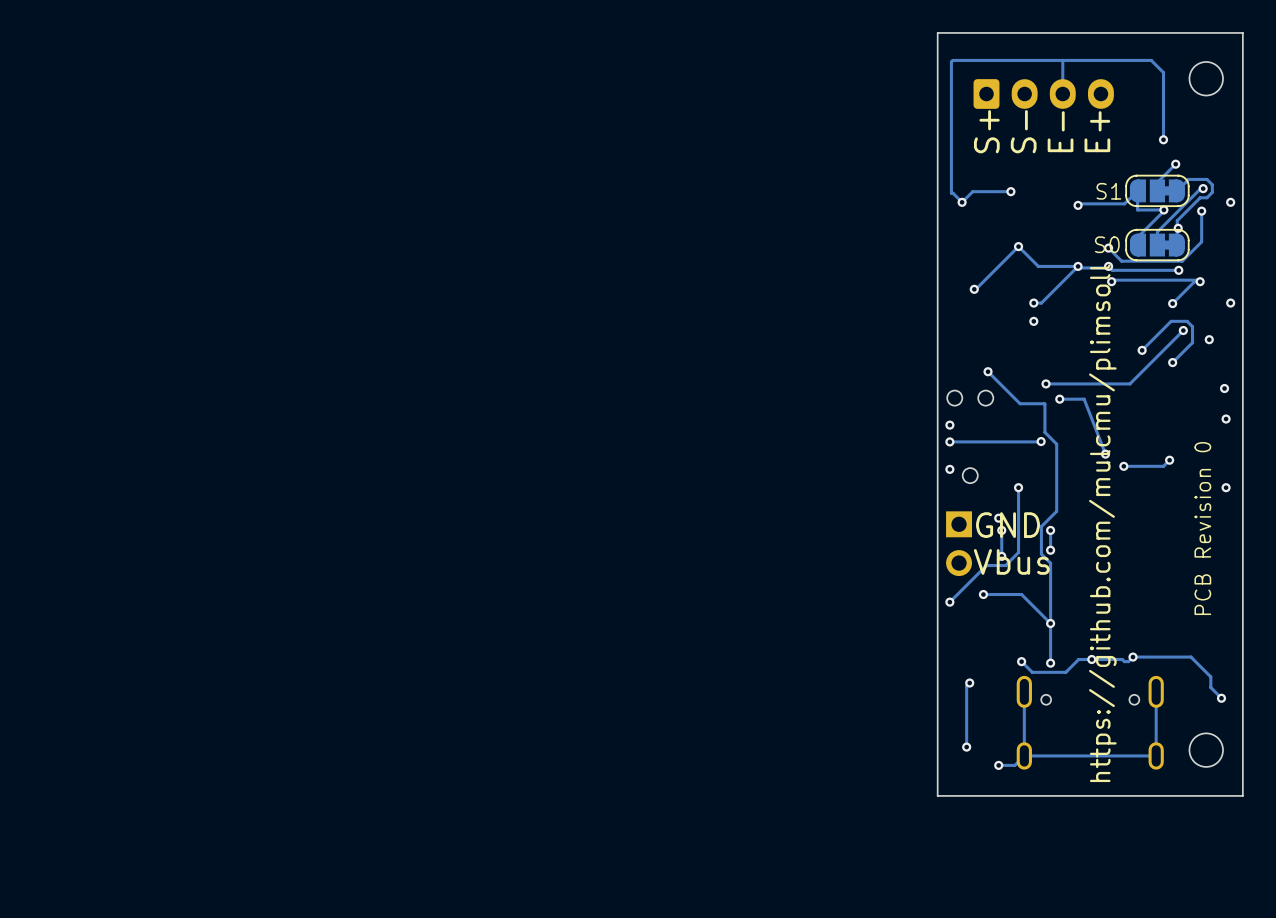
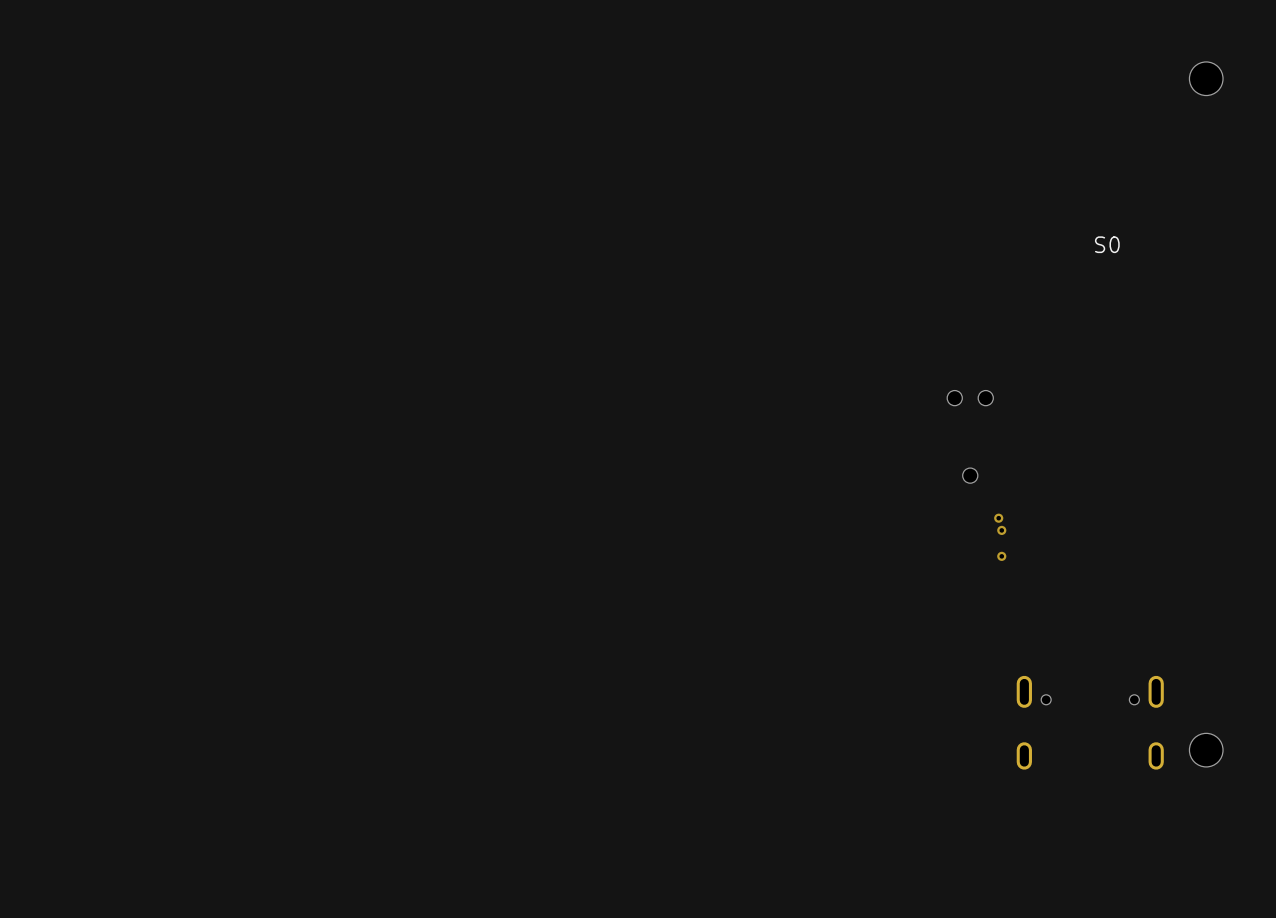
board edge: (1242, 32) (937, 32) (937, 795) (1242, 795) (1242, 32) -> none
track: (1062, 60) (1062, 93) -> none
part: (1043, 93) -> none
text: S+ (986, 131) -> none
text: S- (1023, 131) -> none
text: E- (1060, 131) -> none
text: E+ (1097, 131) -> none
track: (1163, 139) (1163, 72) (1151, 60) (952, 60) (951, 61) (951, 193) (962, 202) (972, 191) (1010, 191) -> none
via: (1163, 139) -> none
track: (1175, 164) (1157, 182) (1157, 190) -> none
via: (1175, 164) -> none
track: (1203, 188) (1200, 188) (1157, 231) (1157, 245) -> none
via: (1203, 188) -> none
part: (1157, 190) -> none
track: (1177, 190) (1188, 179) (1206, 179) (1212, 184) (1212, 192) (1206, 197) (1200, 197) (1177, 220) (1177, 245) -> none
via: (1010, 191) -> none
text: S1 (1108, 191) -> none
via: (962, 202) -> none
via: (1230, 202) -> none
track: (1078, 205) (1124, 203) (1137, 190) (1137, 209) (1163, 209) (1137, 237) (1137, 245) -> none
via: (1078, 205) -> none
via: (1163, 209) -> none
track: (1201, 211) (1201, 241) (1182, 261) (1121, 261) (1108, 248) -> none
via: (1201, 211) -> none
via: (1178, 228) -> none
part: (1157, 245) -> none
via: (1018, 246) -> none
via: (1108, 248) -> none
track: (1078, 266) (1041, 303) (1033, 303) -> none
track: (1078, 266) (1038, 266) (1018, 246) (974, 289) -> none
track: (1078, 266) (1079, 267) (1108, 266) (1112, 270) (1178, 270) -> none
via: (1078, 266) -> none
via: (1108, 266) -> none
via: (1178, 270) -> none
track: (1111, 281) (1113, 280) (1200, 281) (1194, 281) (1172, 303) -> none
via: (1111, 281) -> none
via: (1200, 281) -> none
via: (974, 289) -> none
via: (1033, 303) -> none
via: (1172, 303) -> none
via: (1230, 303) -> none
via: (1033, 321) -> none
track: (1183, 330) (1129, 383) (1046, 383) -> none
via: (1183, 330) -> none
via: (1209, 339) -> none
track: (1142, 350) (1171, 321) (1187, 321) (1192, 326) (1192, 342) (1172, 362) -> none
via: (1142, 350) -> none
via: (1172, 362) -> none
track: (988, 371) (1020, 403) (1044, 404) (1044, 432) (1056, 444) (1056, 511) (1041, 526) (1041, 554) (1050, 563) (1050, 663) -> none
via: (988, 371) -> none
via: (1046, 383) -> none
via: (1224, 388) -> none
track: (1059, 399) (1084, 399) (1105, 454) -> none
via: (1059, 399) -> none
via: (1226, 419) -> none
via: (949, 425) -> none
via: (949, 441) -> none
track: (1041, 441) (949, 441) -> none
via: (1041, 441) -> none
via: (1105, 454) -> none
track: (1169, 460) (1163, 466) (1123, 466) -> none
via: (1169, 460) -> none
via: (1123, 466) -> none
via: (949, 469) -> none
track: (1018, 487) (1018, 552) (1005, 565) (986, 565) (949, 602) -> none
via: (1018, 487) -> none
via: (1226, 487) -> none
text: https://github.com/mulcmu/plimsoll (1102, 523) -> none
text: GND (1008, 525) -> none
text: PCB Revision 0 (1202, 528) -> none
track: (1001, 530) (1001, 556) -> none
track: (1050, 530) (1050, 550) -> none
via: (1050, 530) -> none
part: (959, 543) -> none
via: (1050, 550) -> none
text: Vbus (1011, 561) -> none
track: (983, 594) (1021, 594) (1050, 623) -> none
via: (983, 594) -> none
via: (949, 602) -> none
via: (1050, 623) -> none
via: (1132, 657) -> none
via: (1091, 659) -> none
track: (1021, 661) (1032, 672) (1065, 672) (1078, 659) (1122, 659) (1128, 661) (1132, 657) (1190, 657) (1210, 676) (1210, 687) (1221, 698) -> none
via: (1021, 661) -> none
via: (1050, 663) -> none
track: (969, 683) (966, 686) (966, 747) -> none
via: (969, 683) -> none
track: (1024, 691) (1024, 755) -> none
track: (1156, 691) (1156, 755) (1024, 755) -> none
via: (1221, 698) -> none
via: (966, 747) -> none
track: (1024, 755) (1014, 765) (998, 765) -> none
via: (998, 765) -> none

